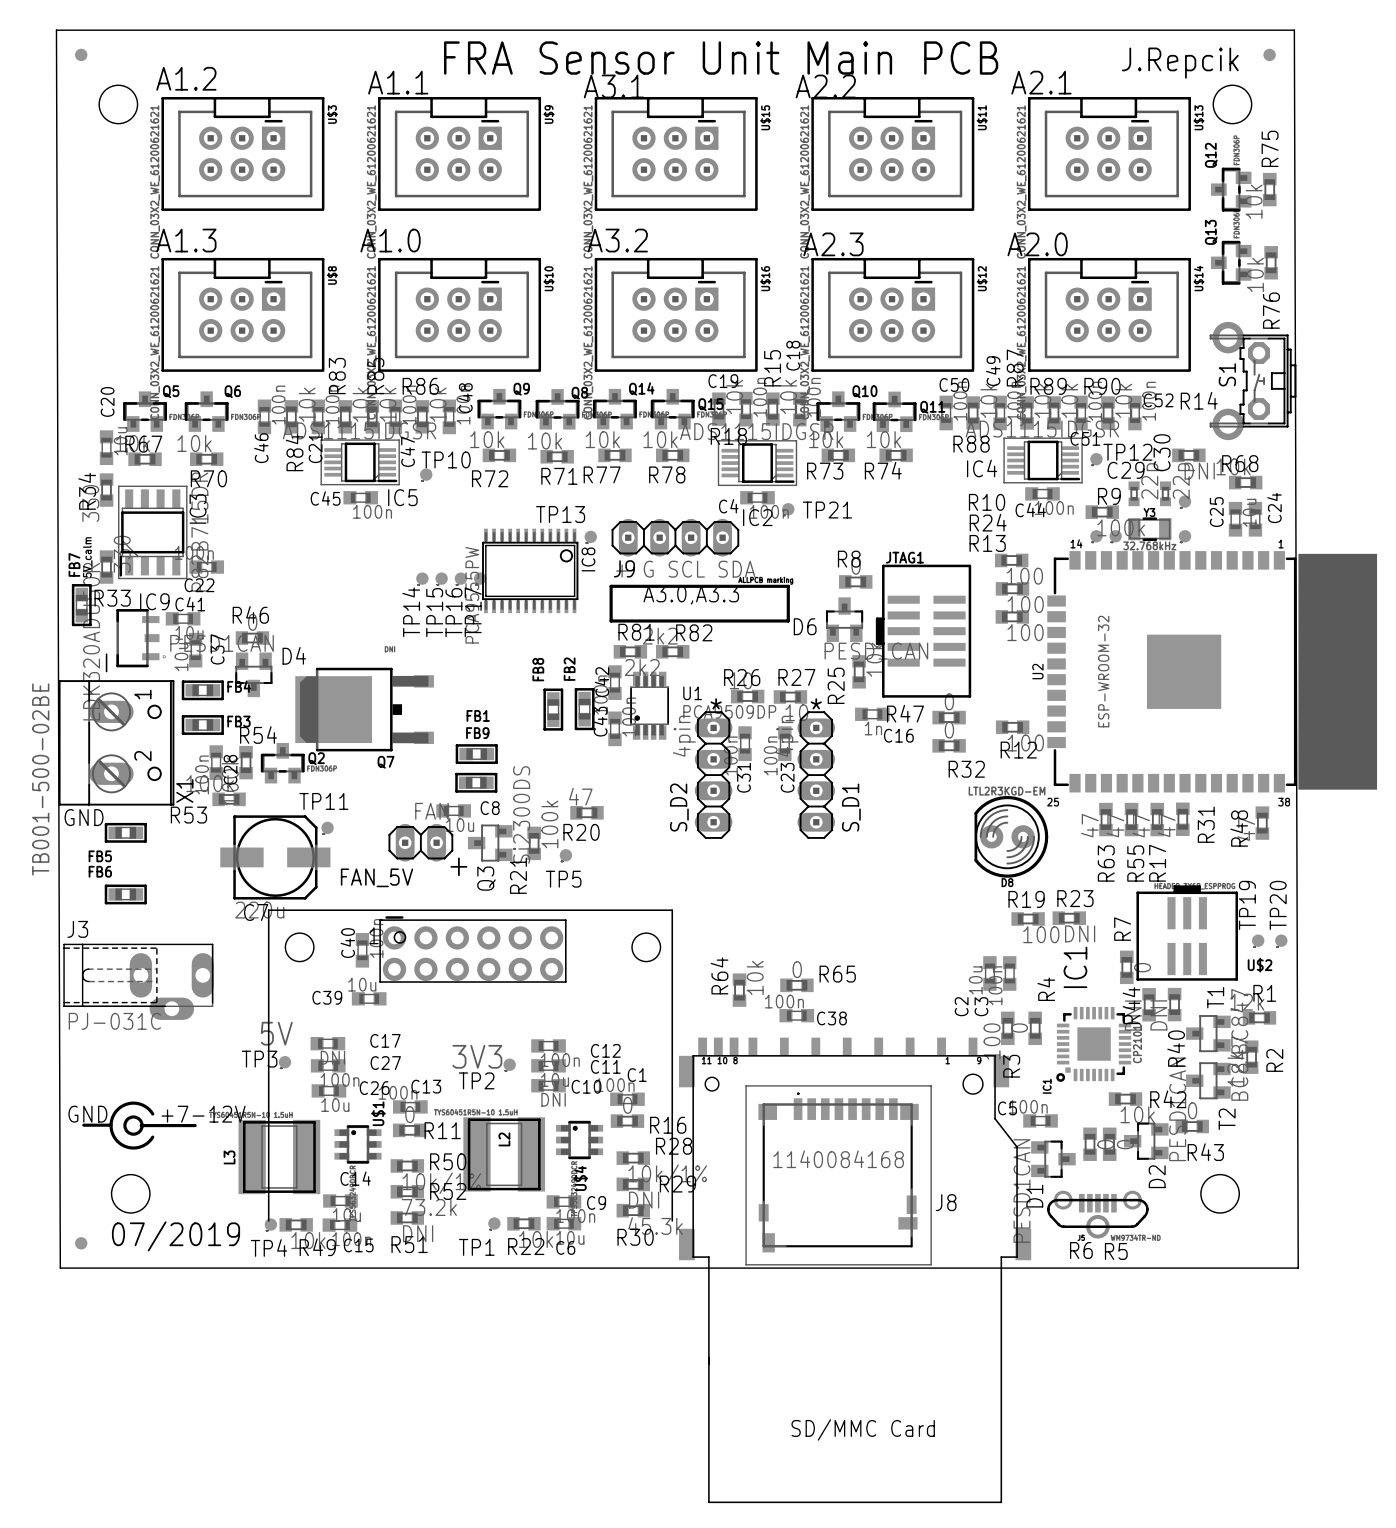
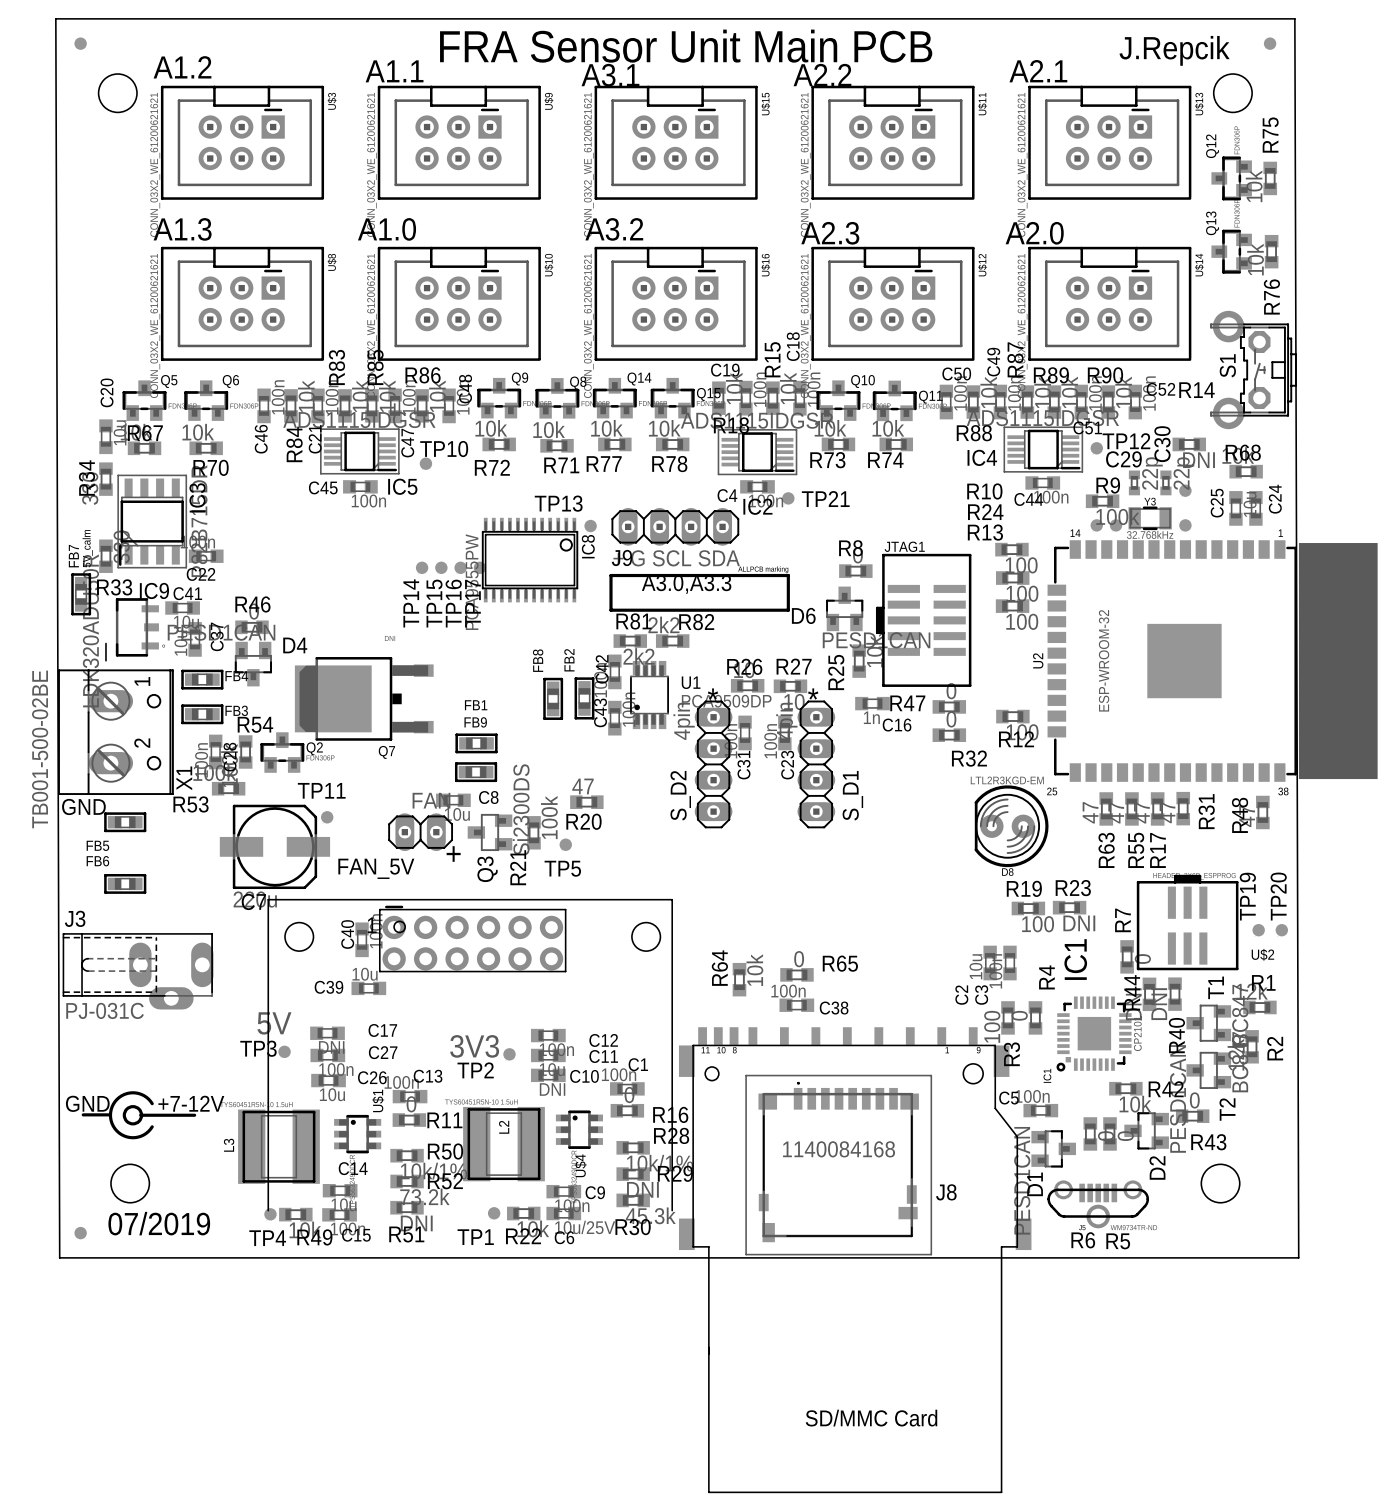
C6 value: 10u (570, 1237) -> 10u/25V (585, 1227)

